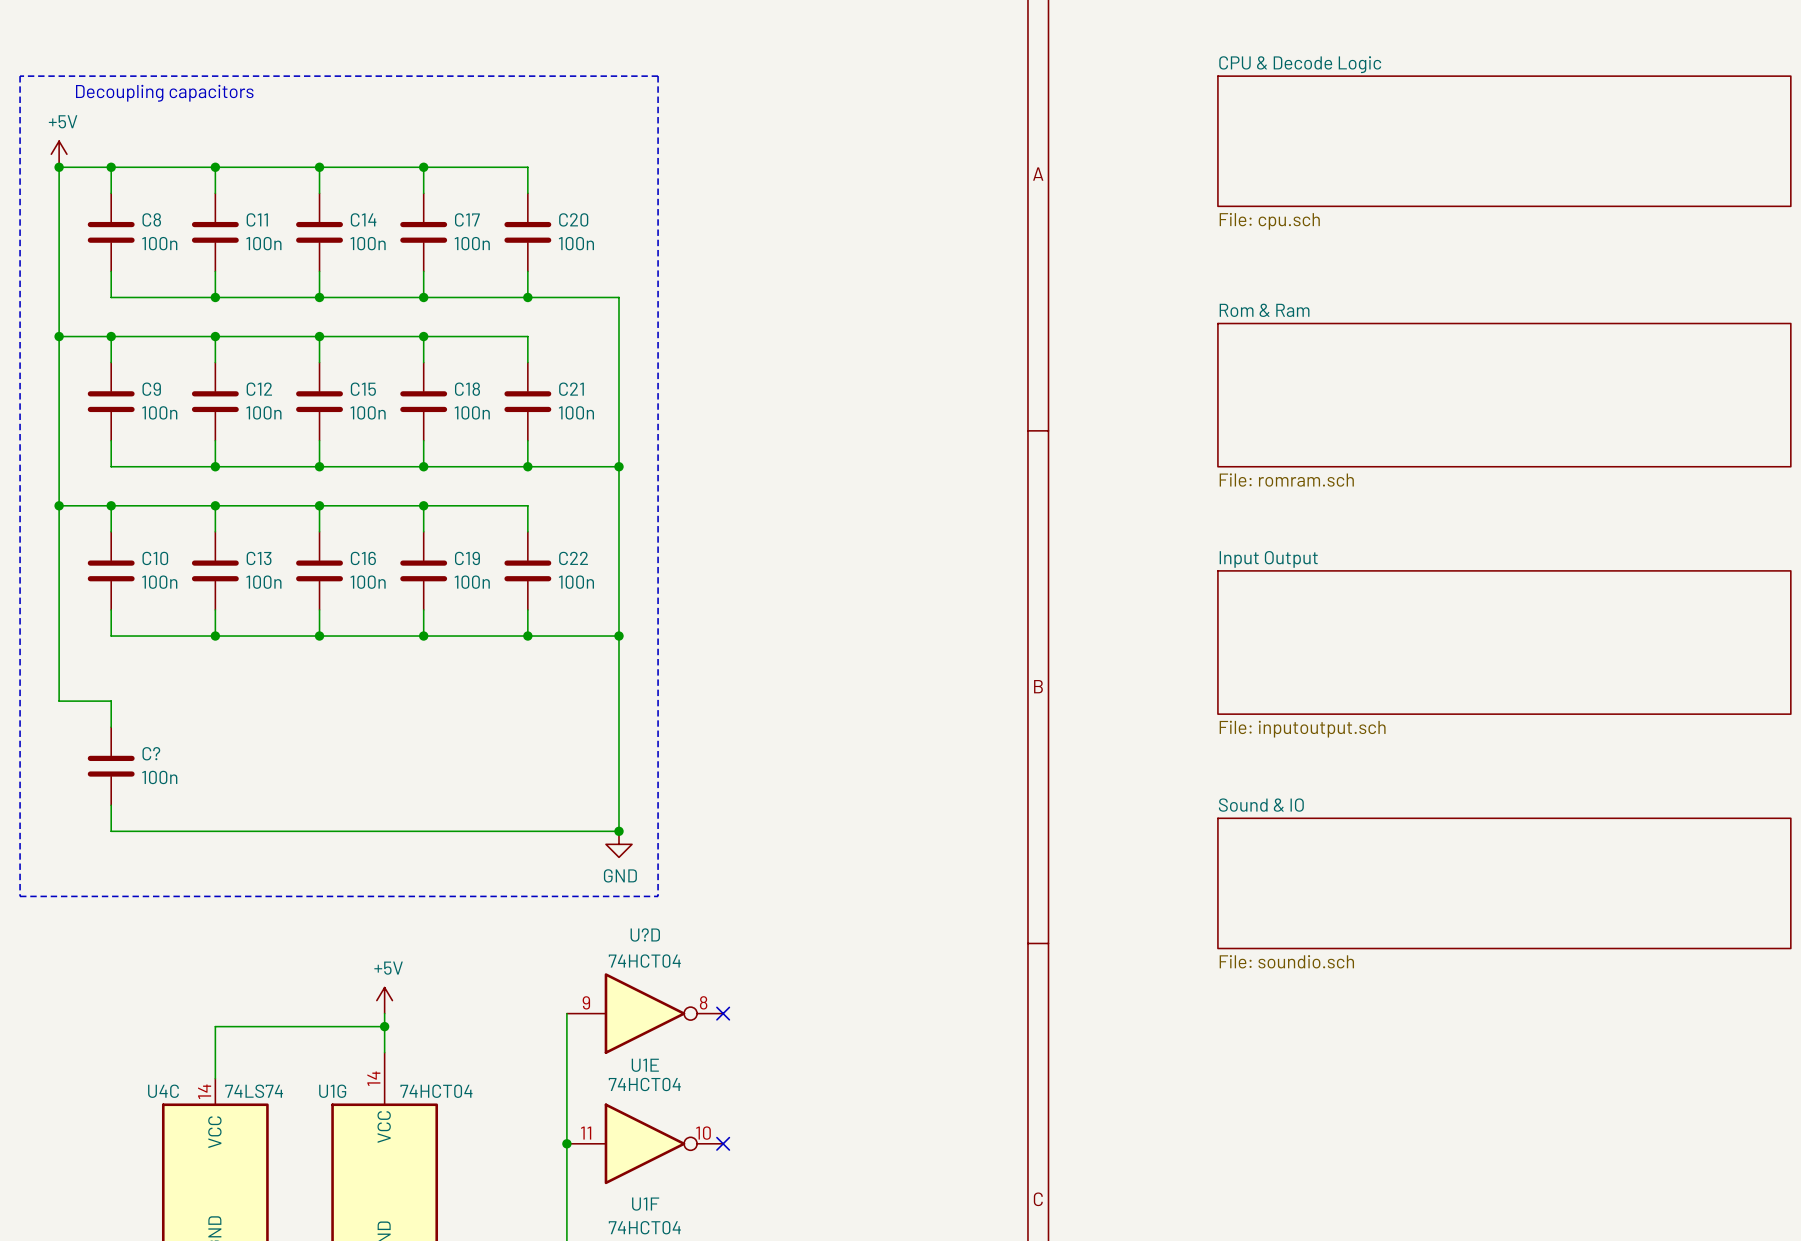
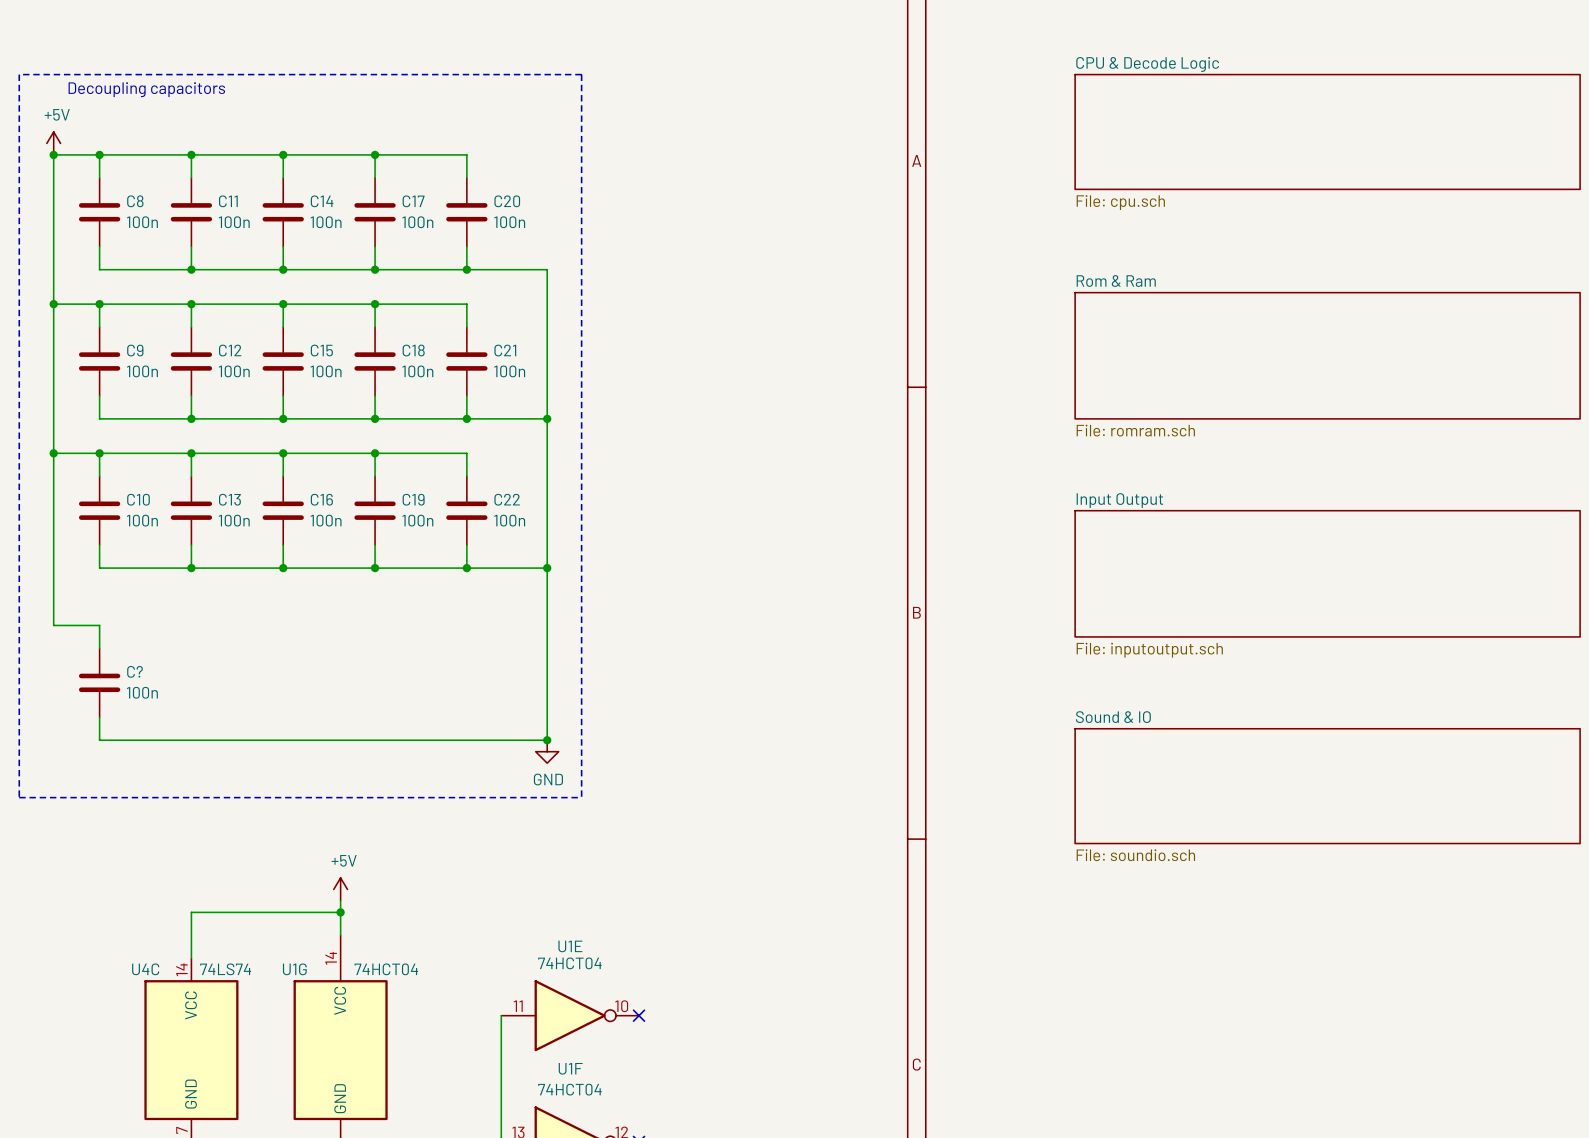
wire: (566, 1013) (566, 1143) -> none
U?D: 74HCT04 (645, 1013) -> none
no-connect mark: (723, 1013) -> none
junction: (566, 1143) -> none

